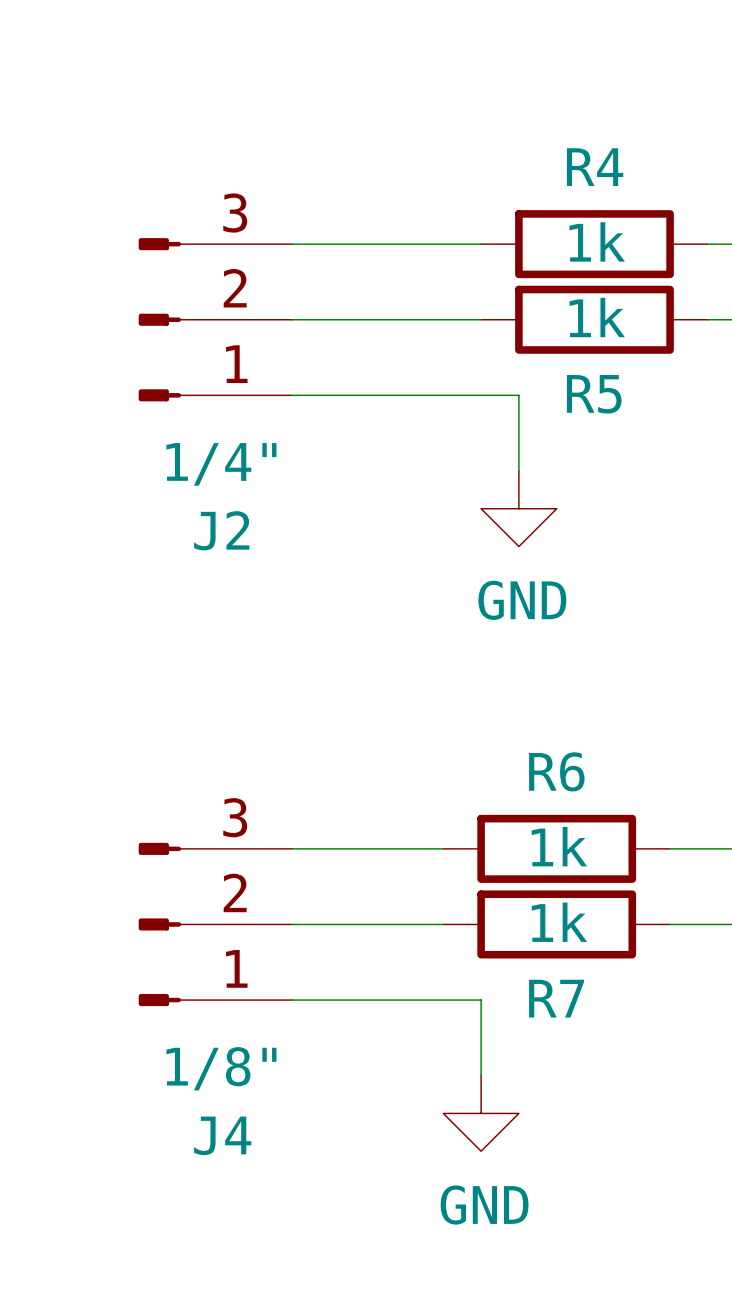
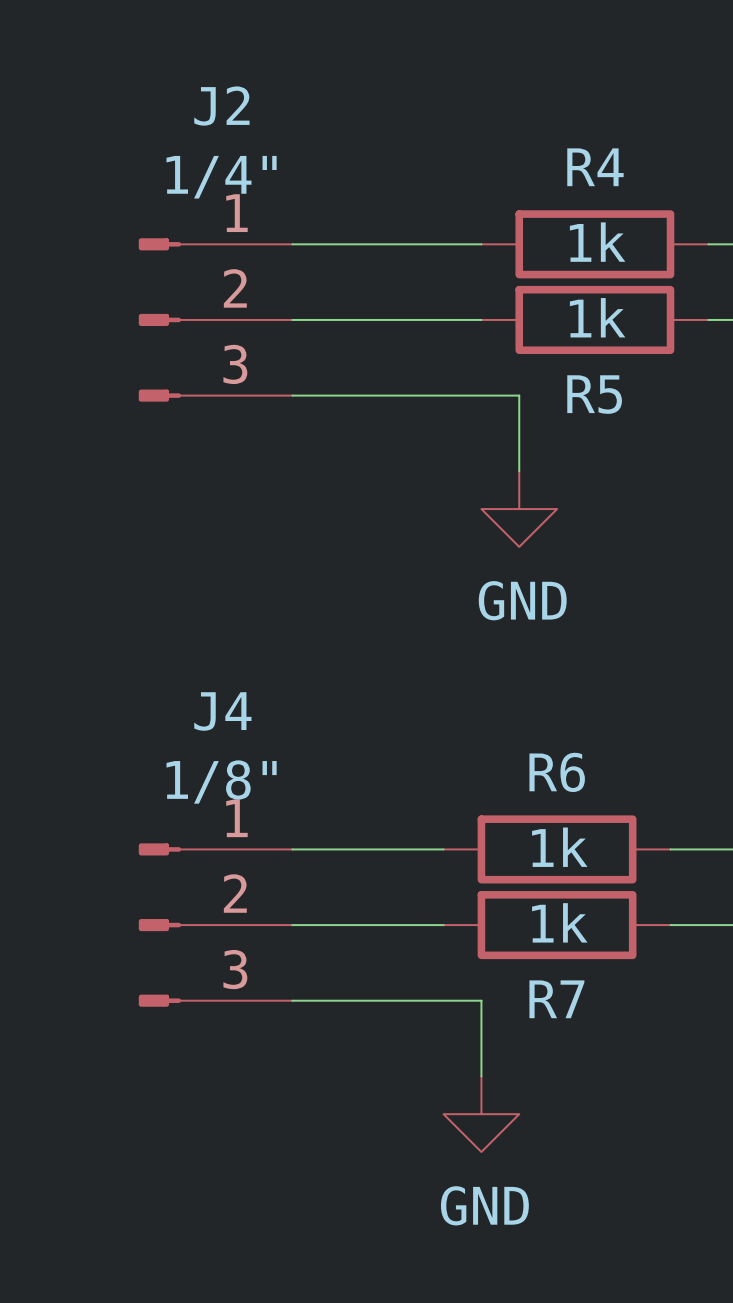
J2 flip: as is (159, 319) -> up-down (159, 319)
J4 flip: as is (159, 924) -> up-down (159, 925)

